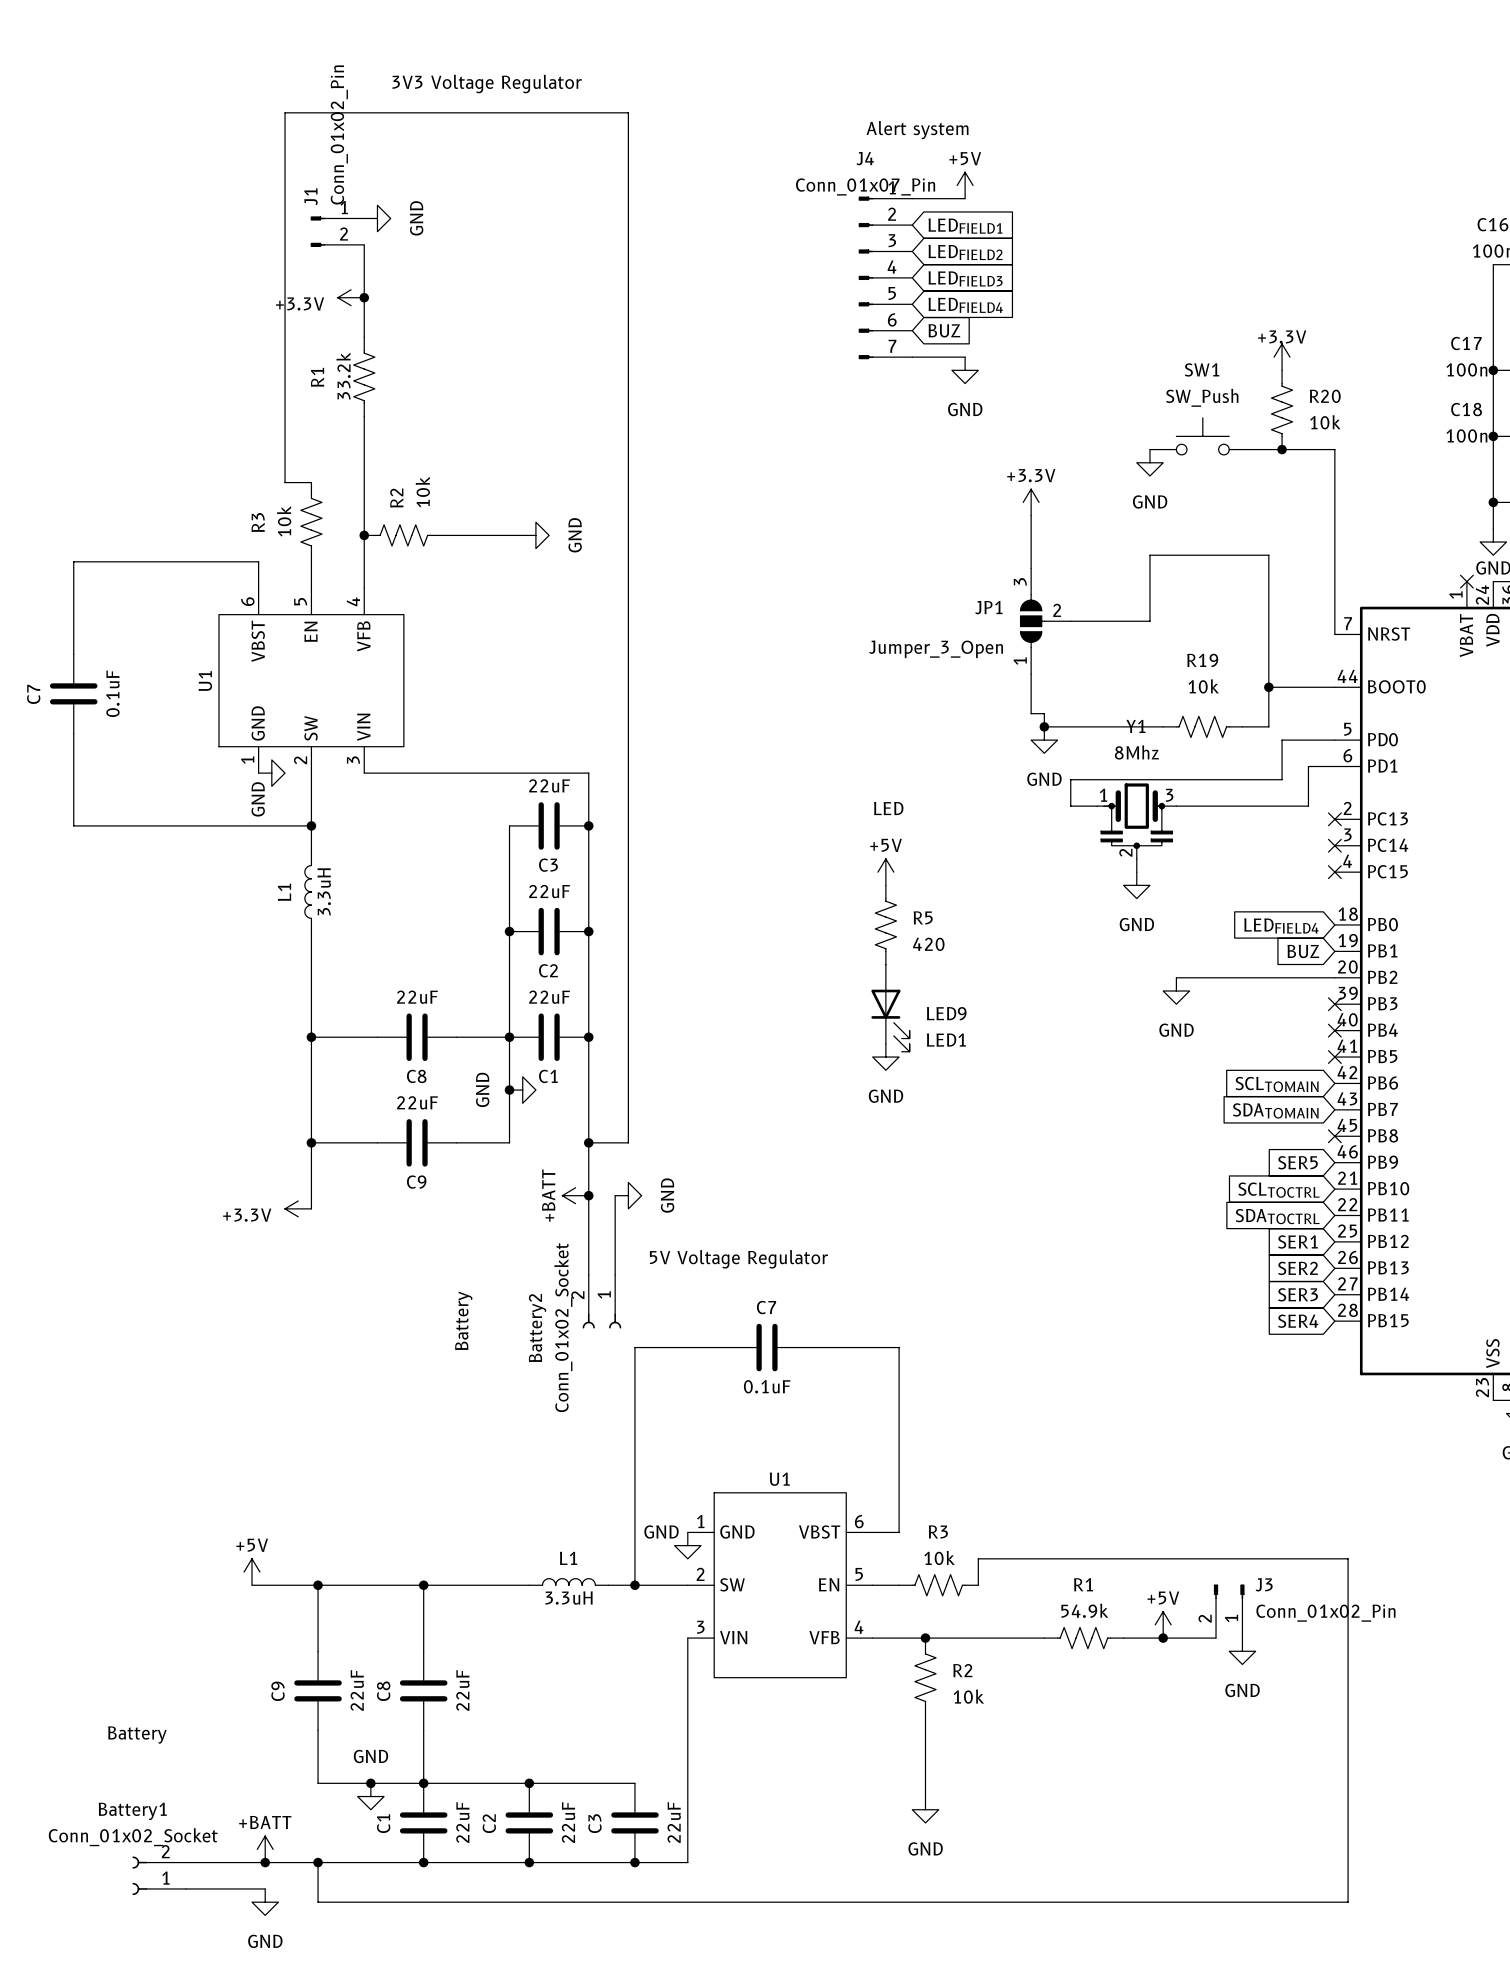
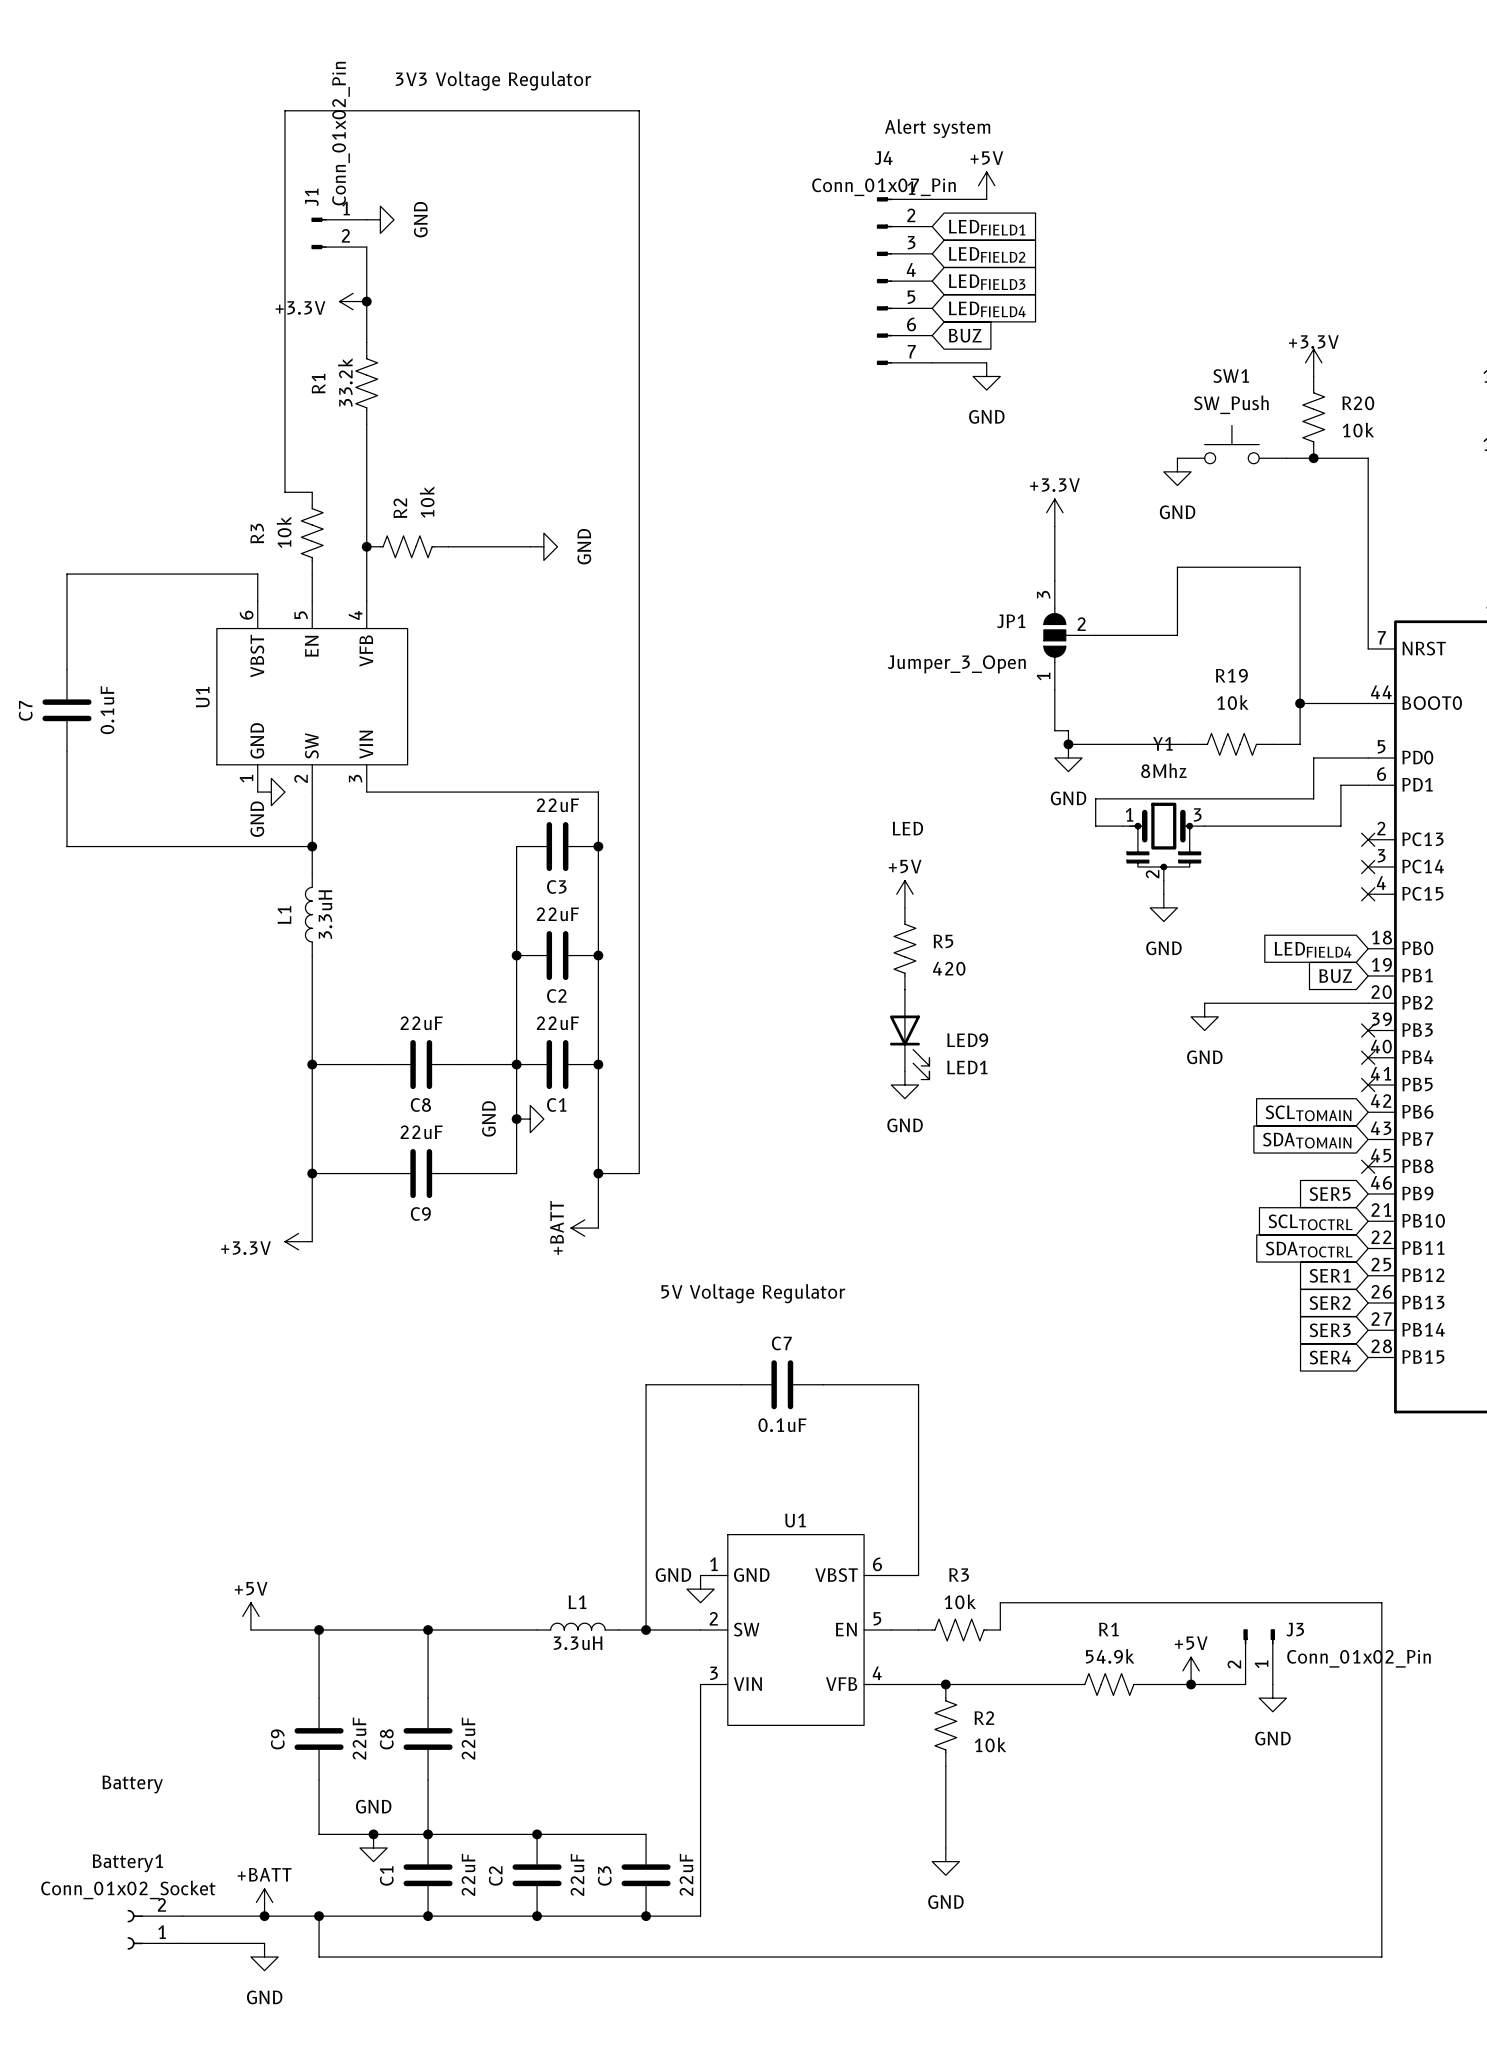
wire: (588, 1195) (588, 1274) -> none
junction: (588, 1195) -> none
wire: (615, 1195) (615, 1274) -> none
power symbol: GND (628, 1195) -> none
Battery2: Conn_01x02_Socket (601, 1301) -> none
text: Battery (463, 1320) -> none

